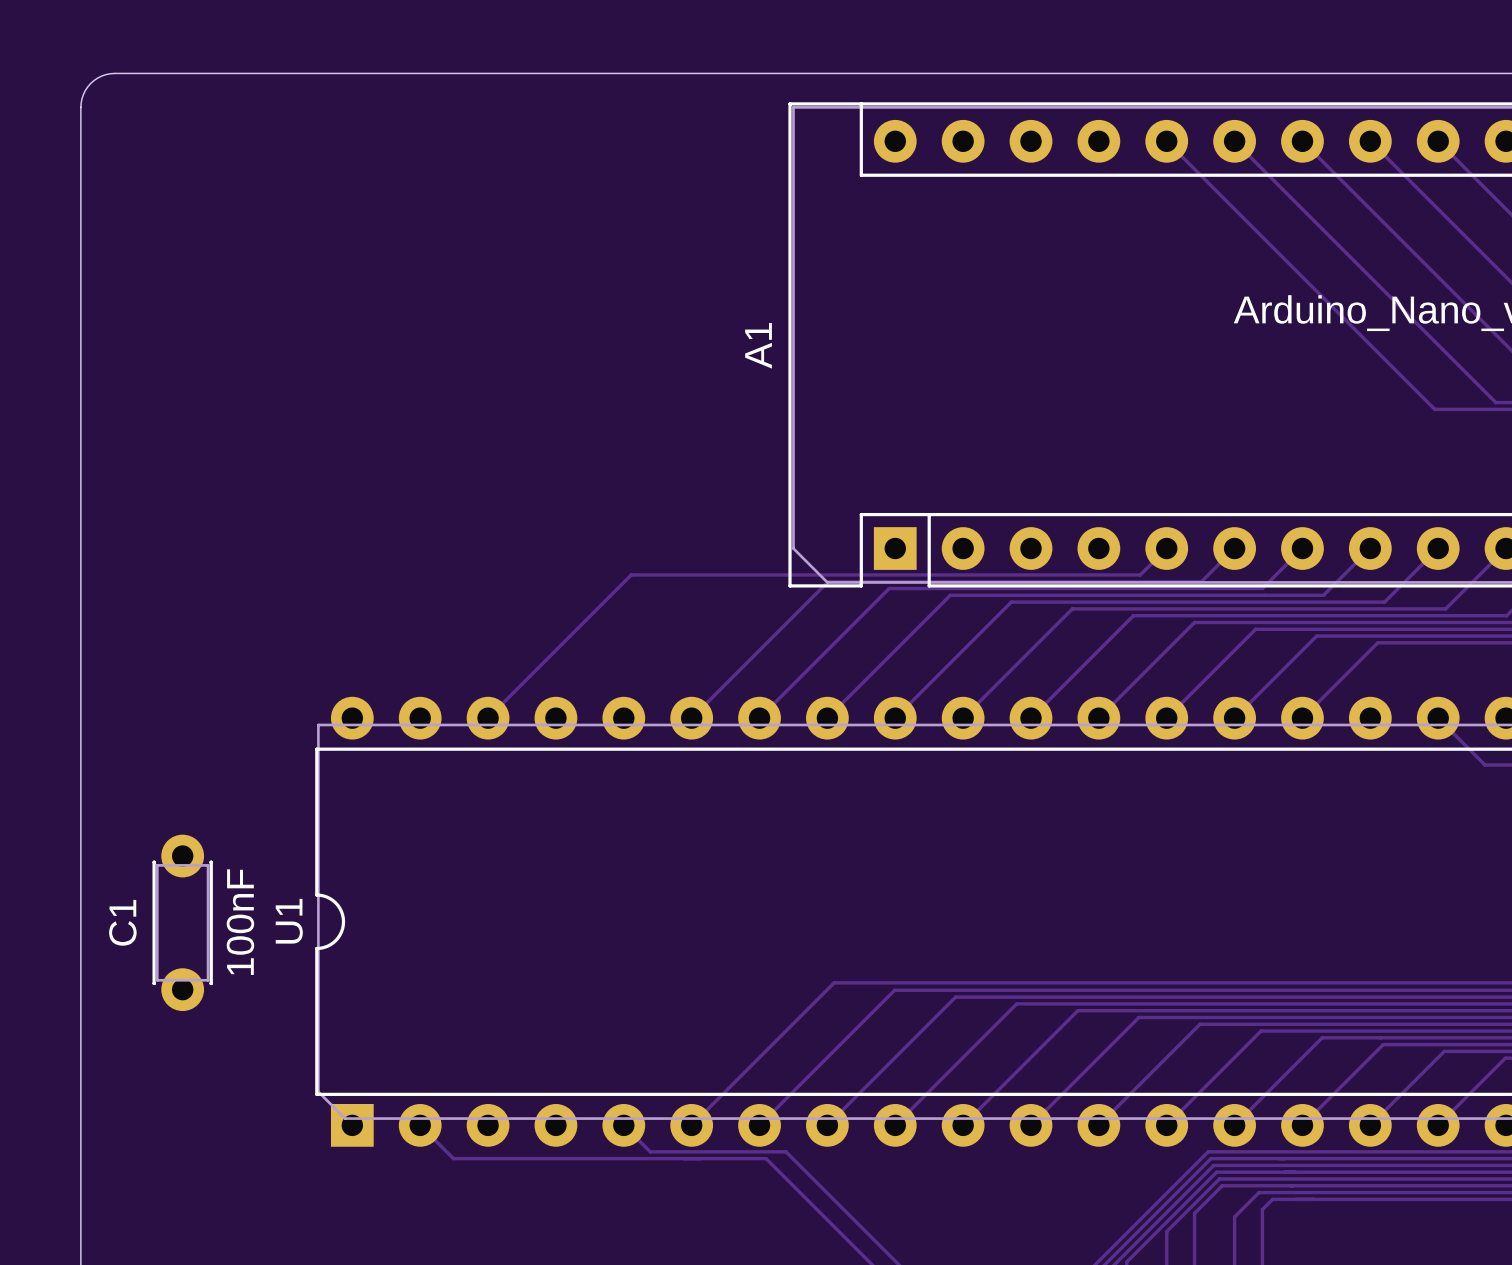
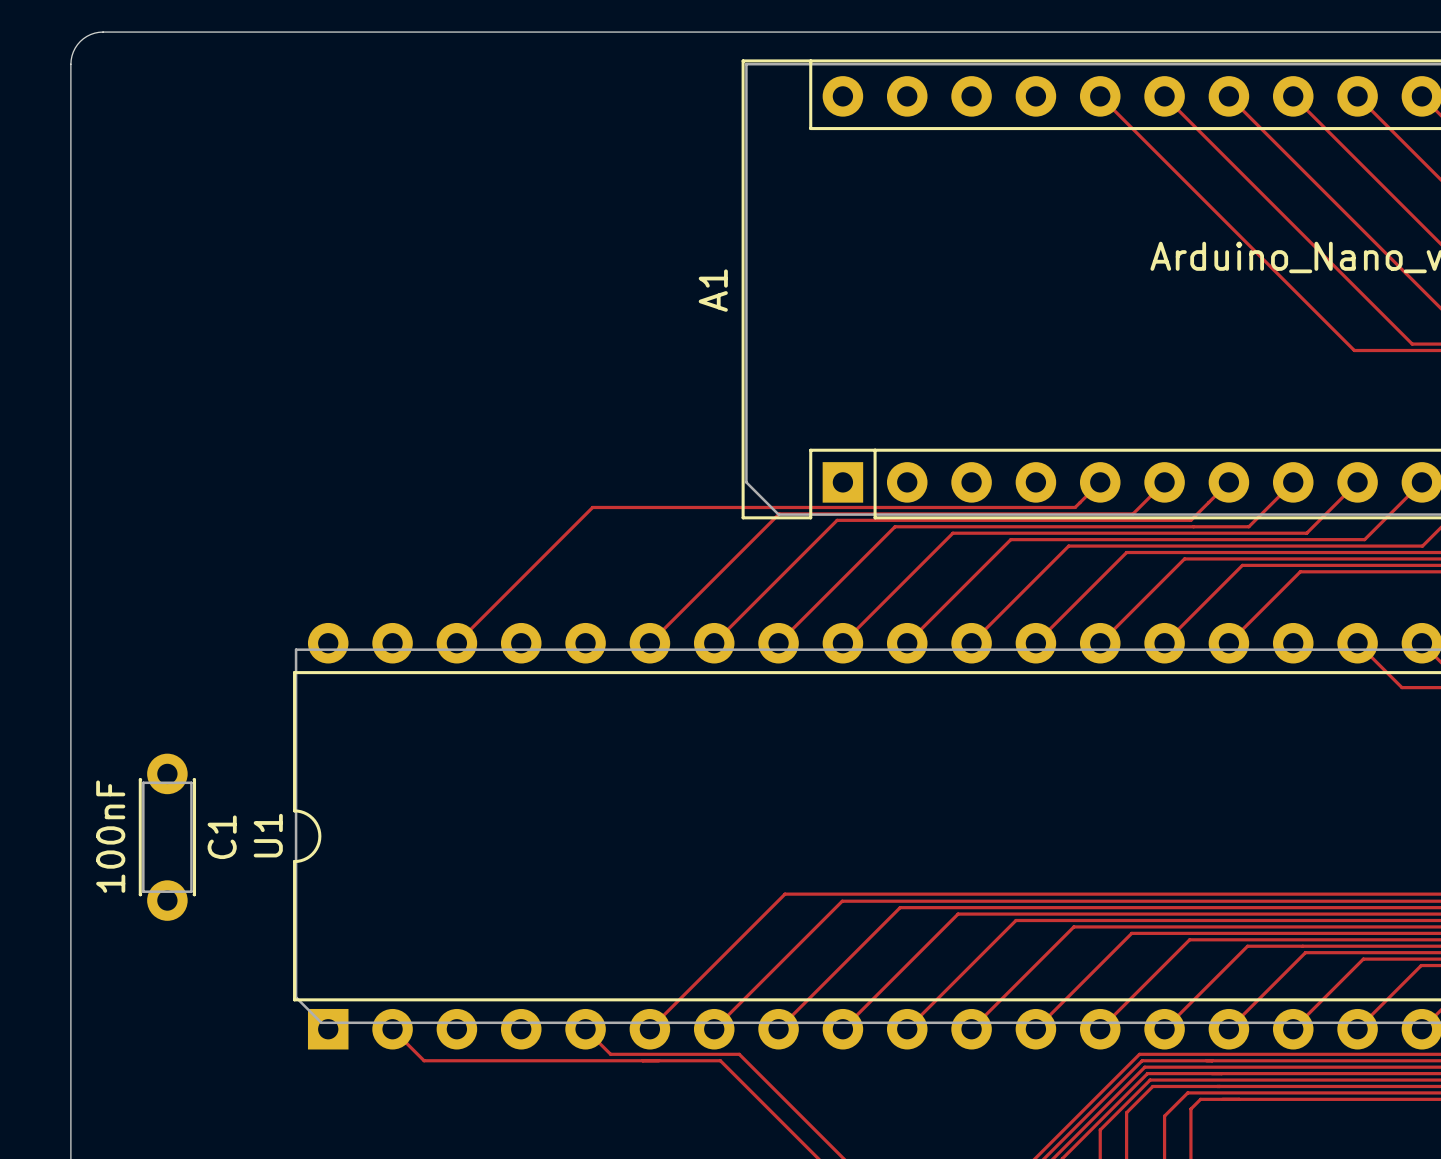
C1 name position: C1 (122, 922) -> C1 (222, 837)
C1 value position: 100nF (240, 922) -> 100nF (110, 836)

